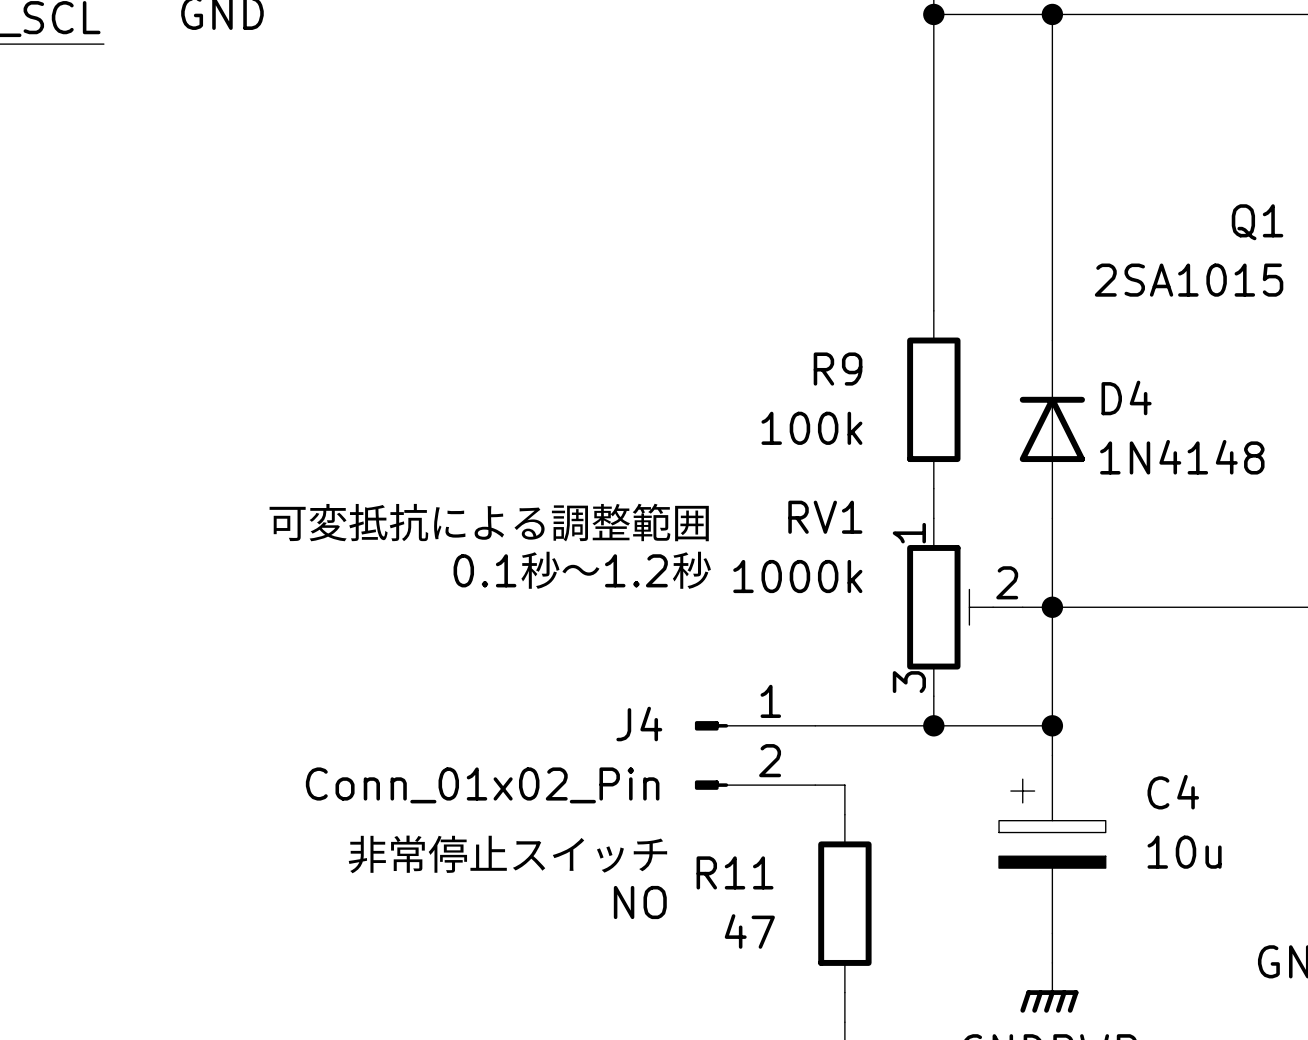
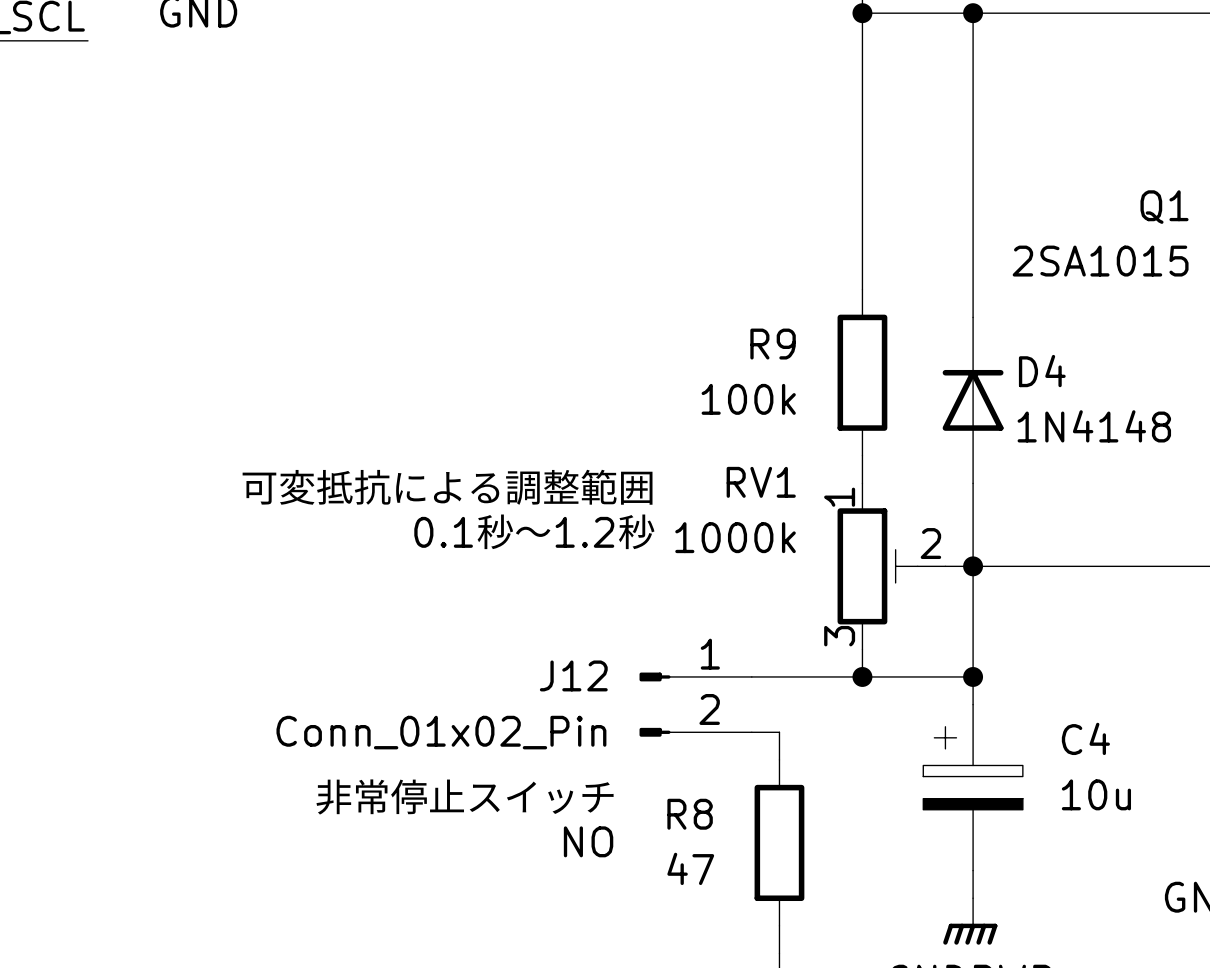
J4 name: J4 (639, 724) -> J12 (573, 675)
R11 name: R11 (735, 872) -> R8 (690, 814)

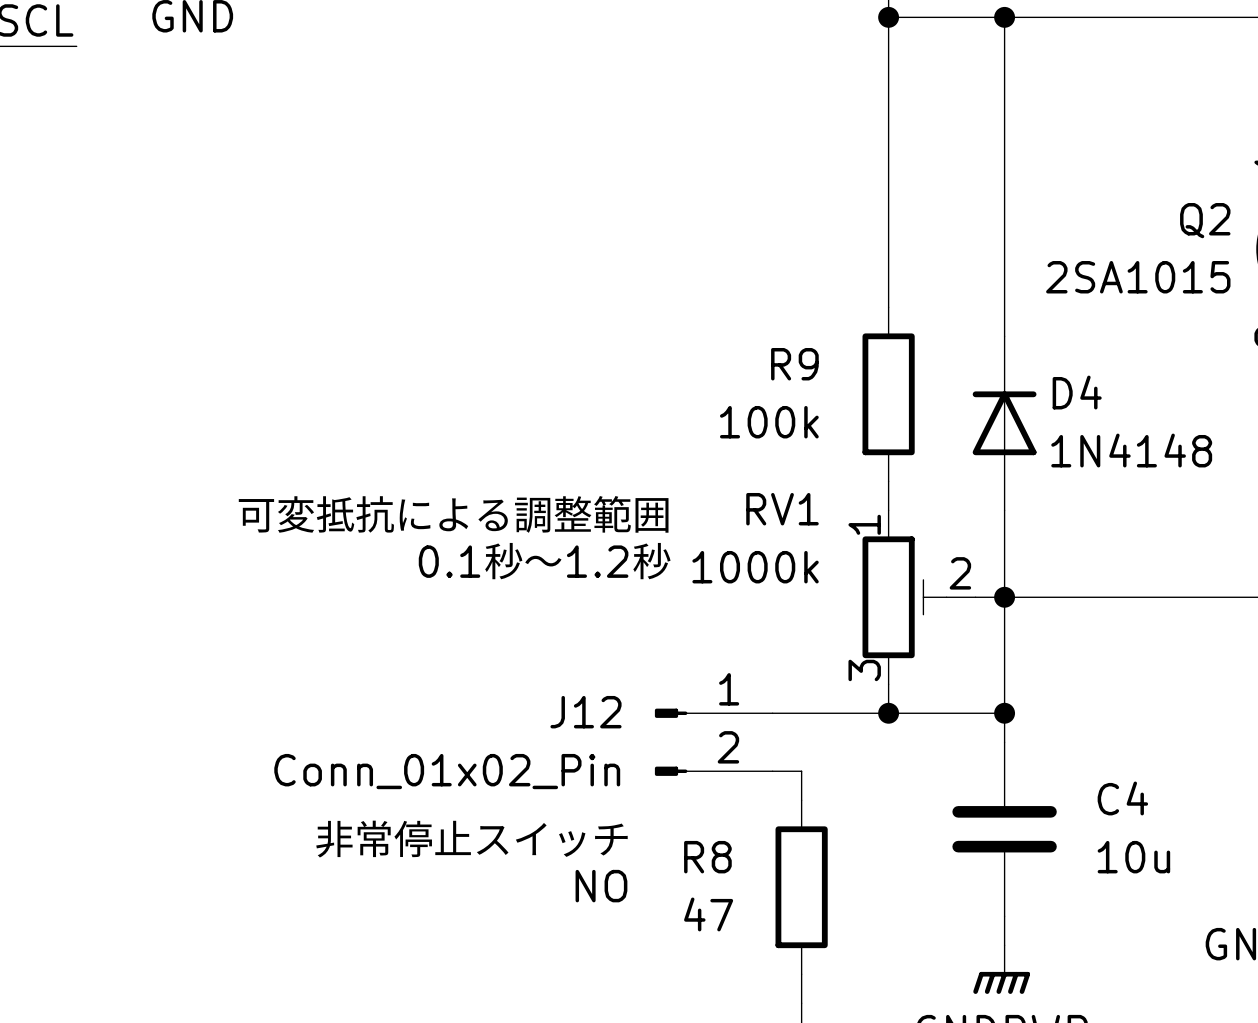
Q1 name: Q1 (1164, 207) -> Q2 (1205, 220)
C4 symbol: [923, 704, 1023, 871] -> [952, 742, 1057, 917]

